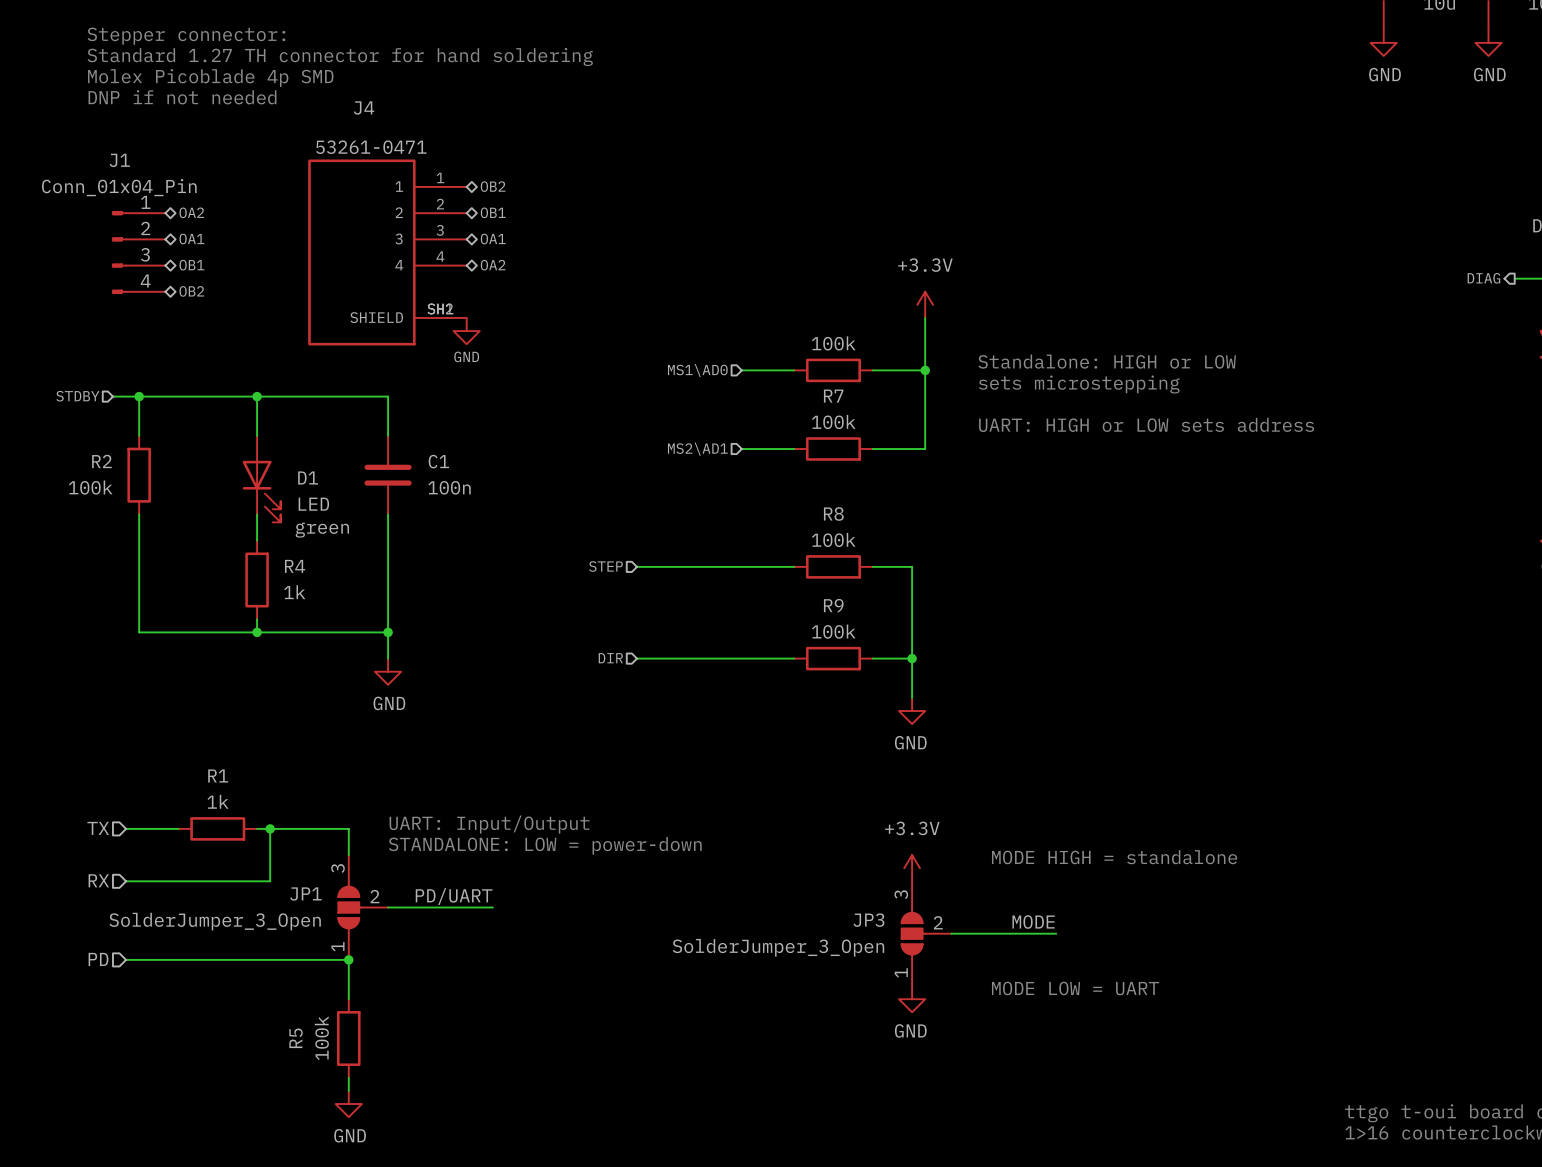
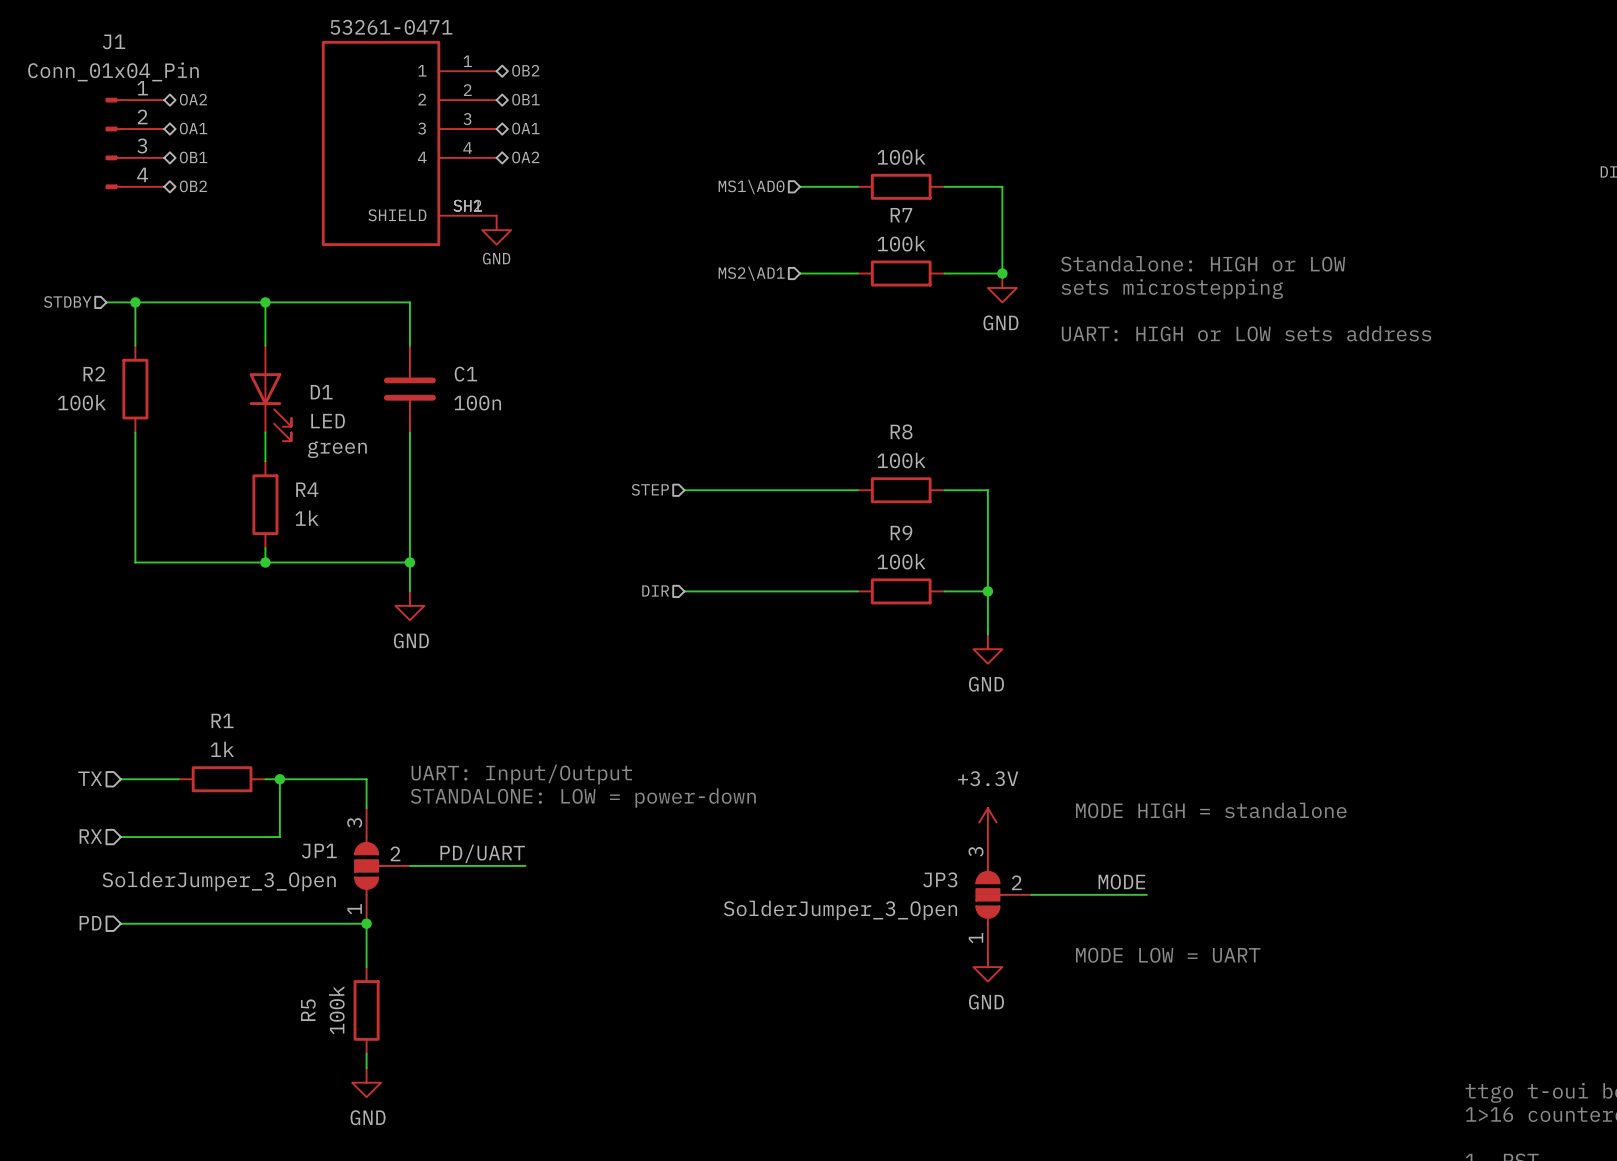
hierarchical label: none -> MS1\AD0 (751, 187)
part: none -> 100k (901, 186)
wire: none -> (944, 186) (1002, 186) (1002, 215)
power symbol: +3.3V (925, 304) -> none
R7 name: none -> R7 (901, 215)
hierarchical label: MS1\AD0 (697, 370) -> MS2\AD1 (751, 273)
wire: (925, 370) (925, 448) (872, 448) -> none
power symbol: none -> GND (1002, 287)
wire: (741, 448) (794, 448) -> (800, 186) (857, 186)
R7: 100k (833, 448) -> none
hierarchical label: MS2\AD1 (697, 449) -> none

